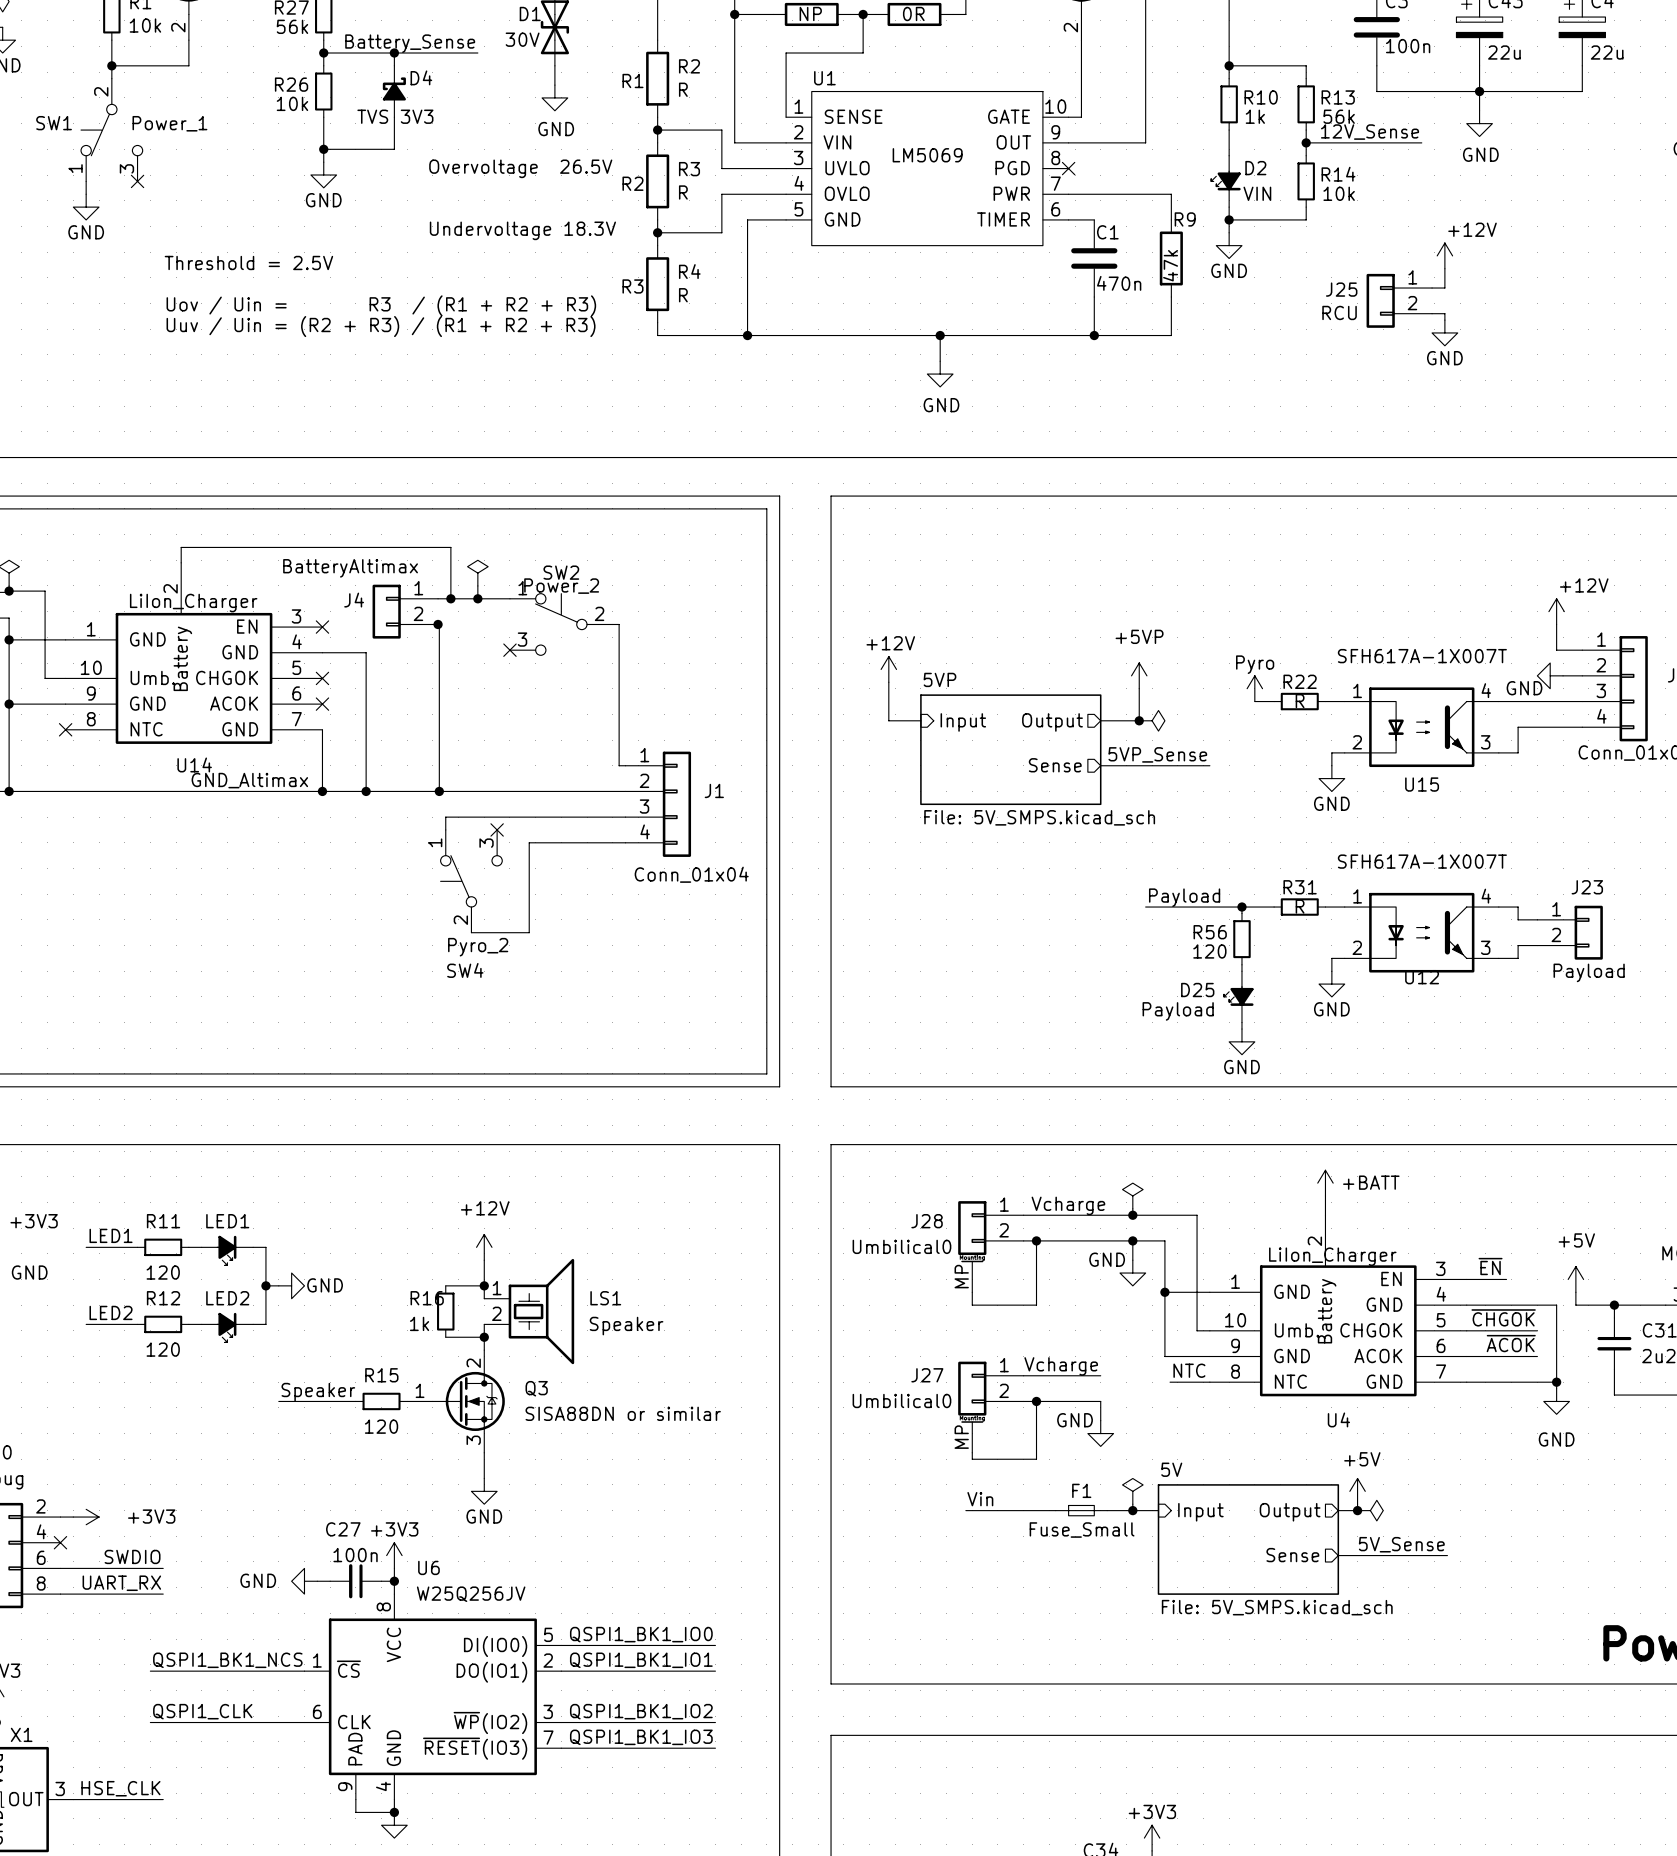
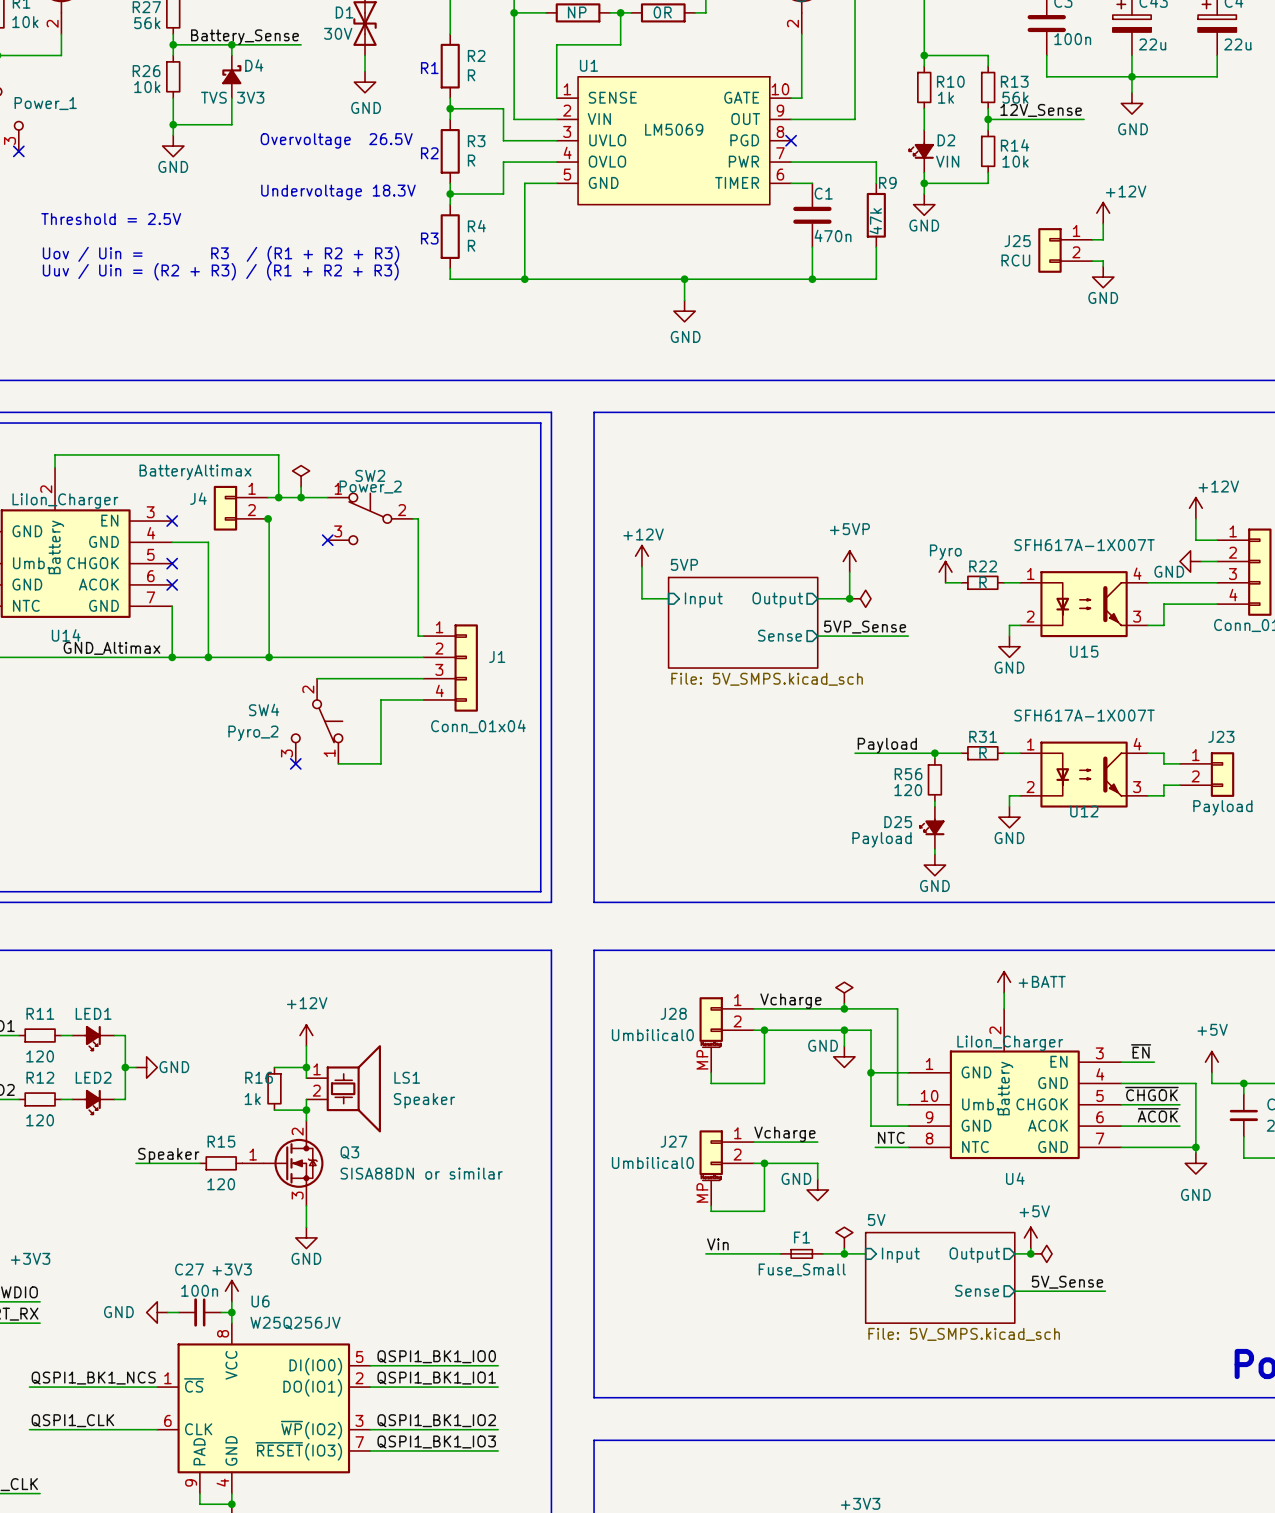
wire: (497, 817) (445, 817) (445, 829) -> none
no-connect mark: (497, 829) -> none
wire: (574, 842) (529, 842) (529, 932) (471, 932) -> (380, 699) (380, 763) (338, 763)
SW4 rotation: 0° (471, 881) -> 180° (317, 721)
no-connect mark: none -> (295, 763)
SW4 value position: Pyro_2 (478, 947) -> Pyro_2 (253, 733)
SW4 name position: SW4 (465, 970) -> SW4 (264, 709)

